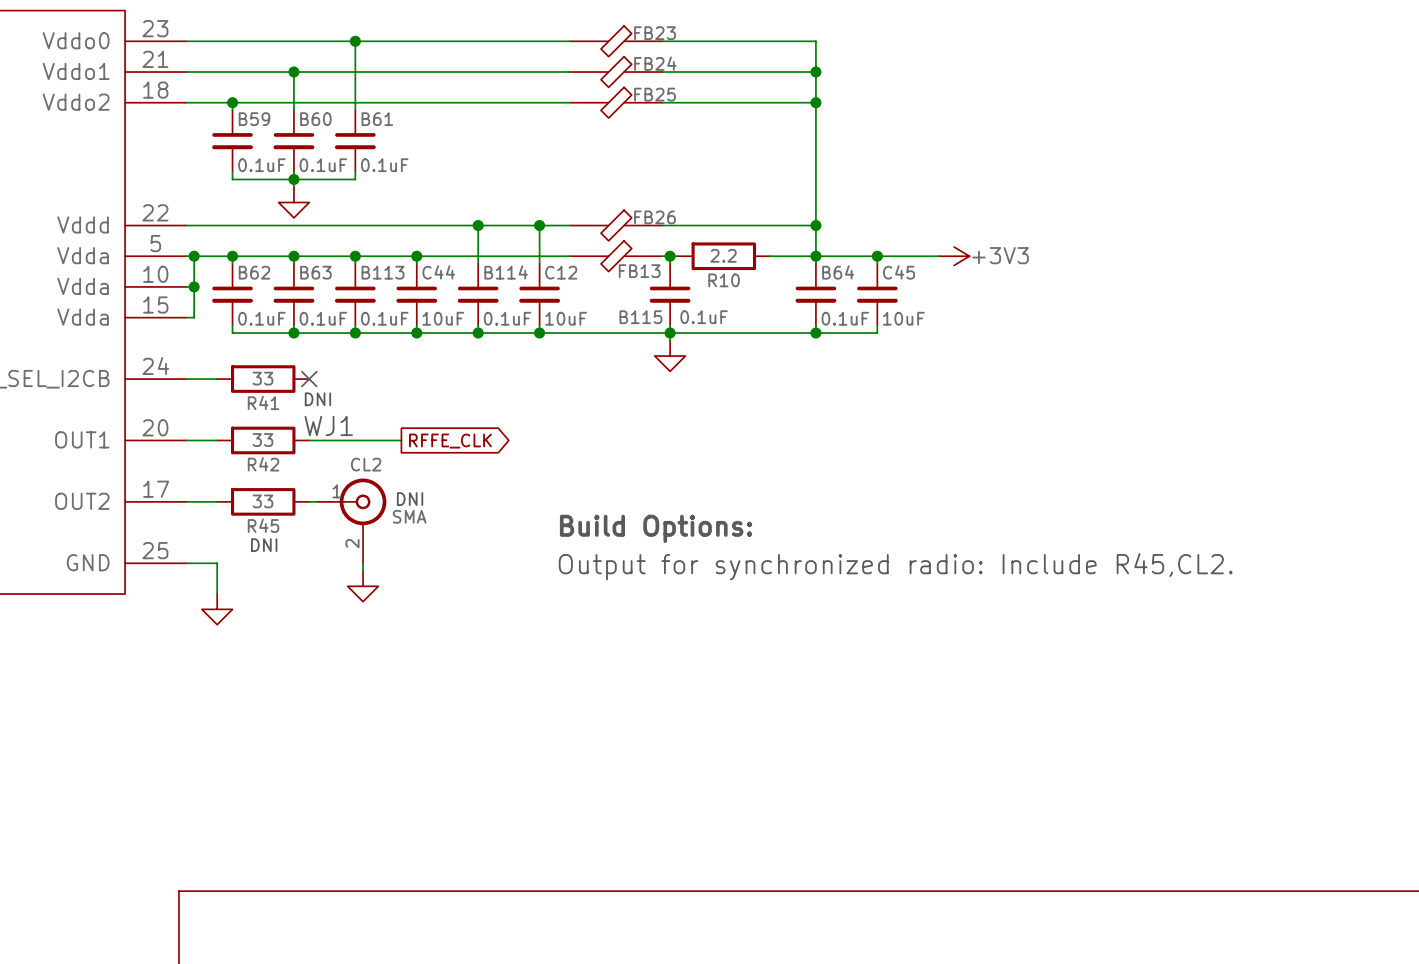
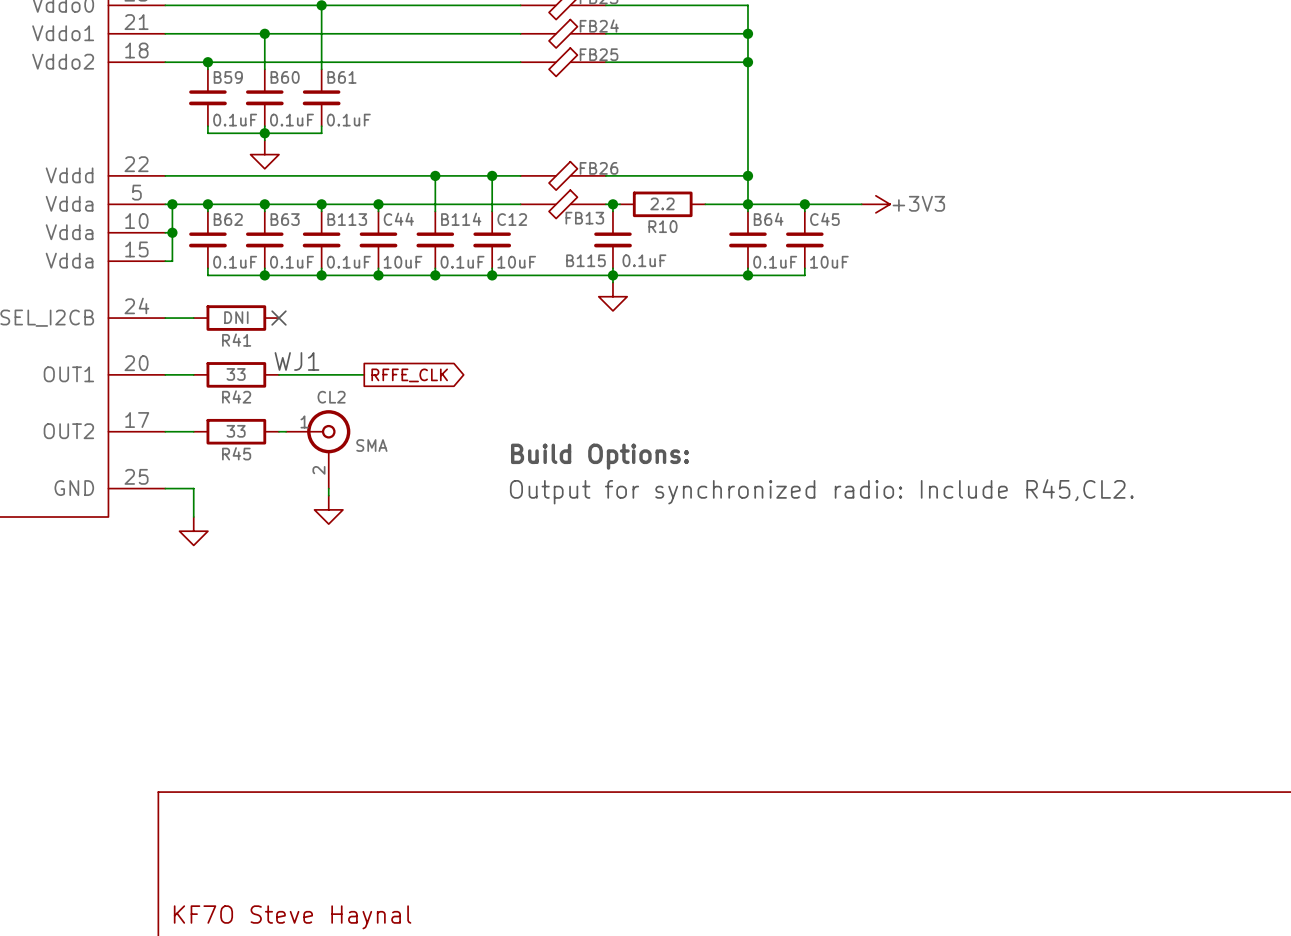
R41 value: 33 (262, 378) -> DNI (236, 317)
text: DNI (317, 399) -> none
text: DNI (410, 499) -> none
text: DNI (264, 545) -> none

